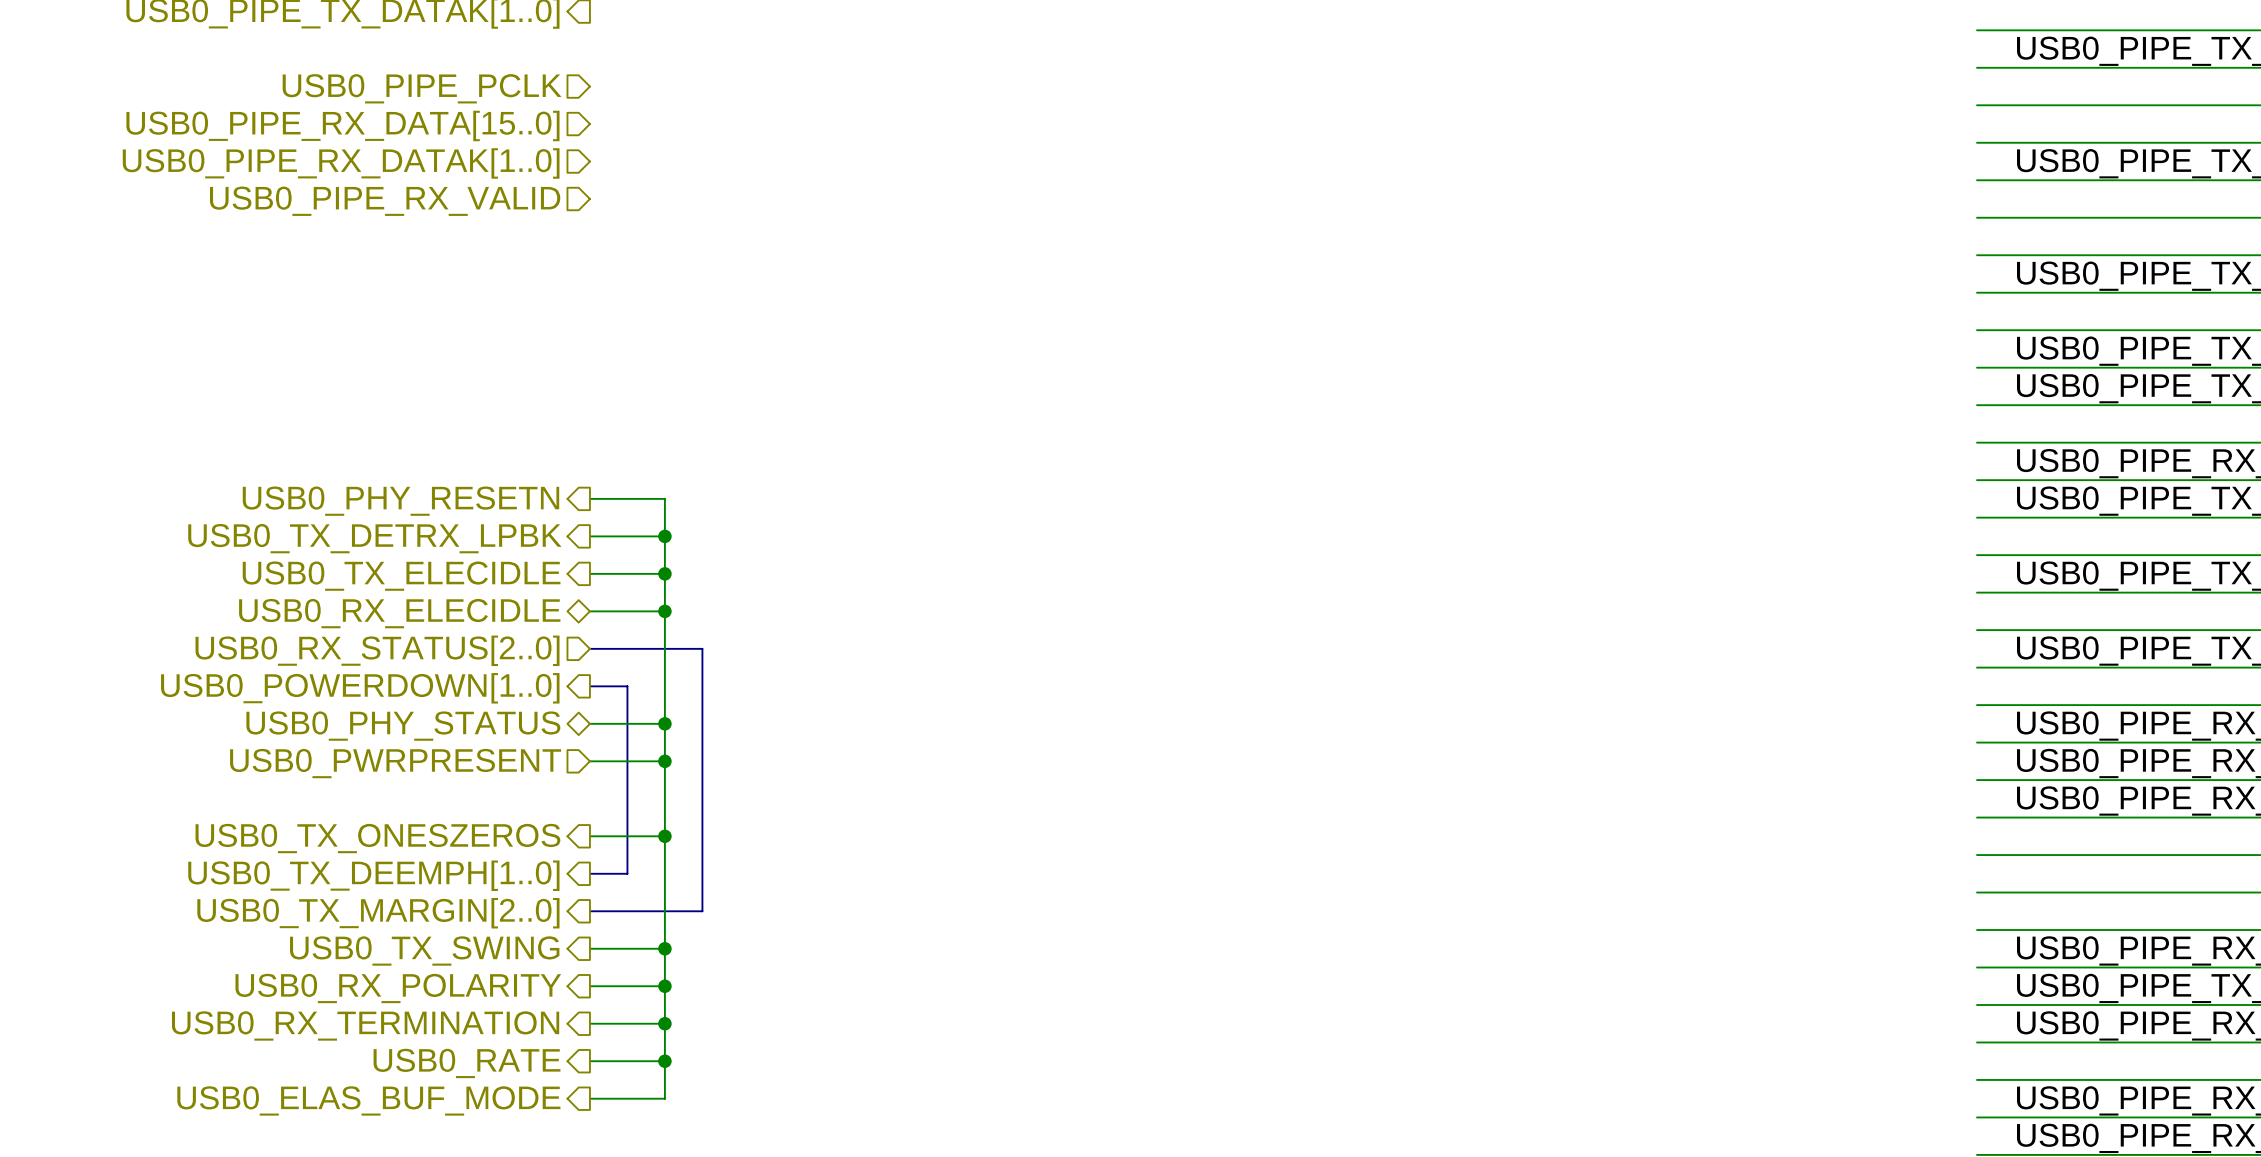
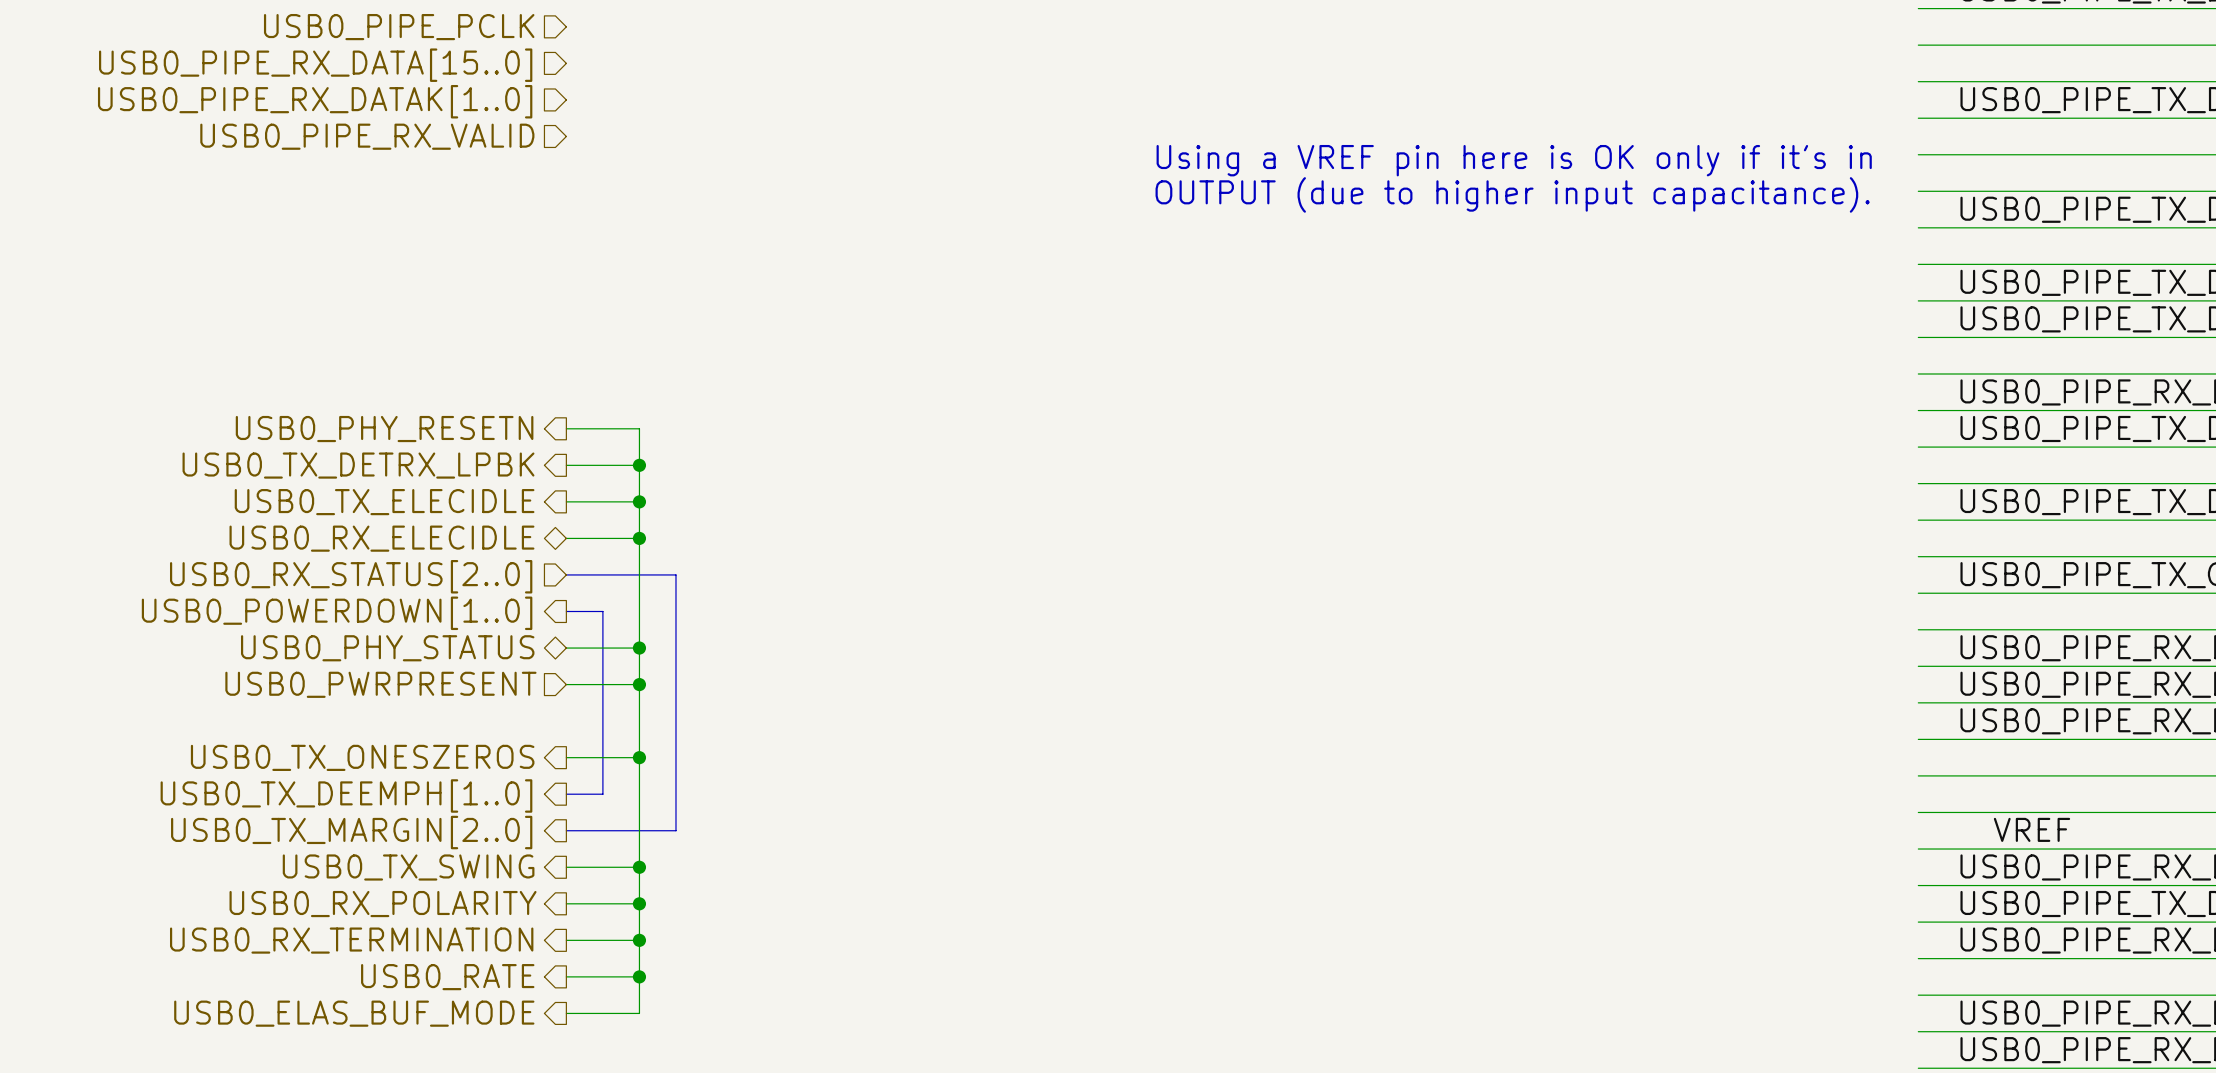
text: none -> Using a VREF pin here is OK only if it's in (1514, 160)
text: none -> OUTPUT (due to higher input capacitance). (1512, 194)
label: none -> VREF (2032, 829)

